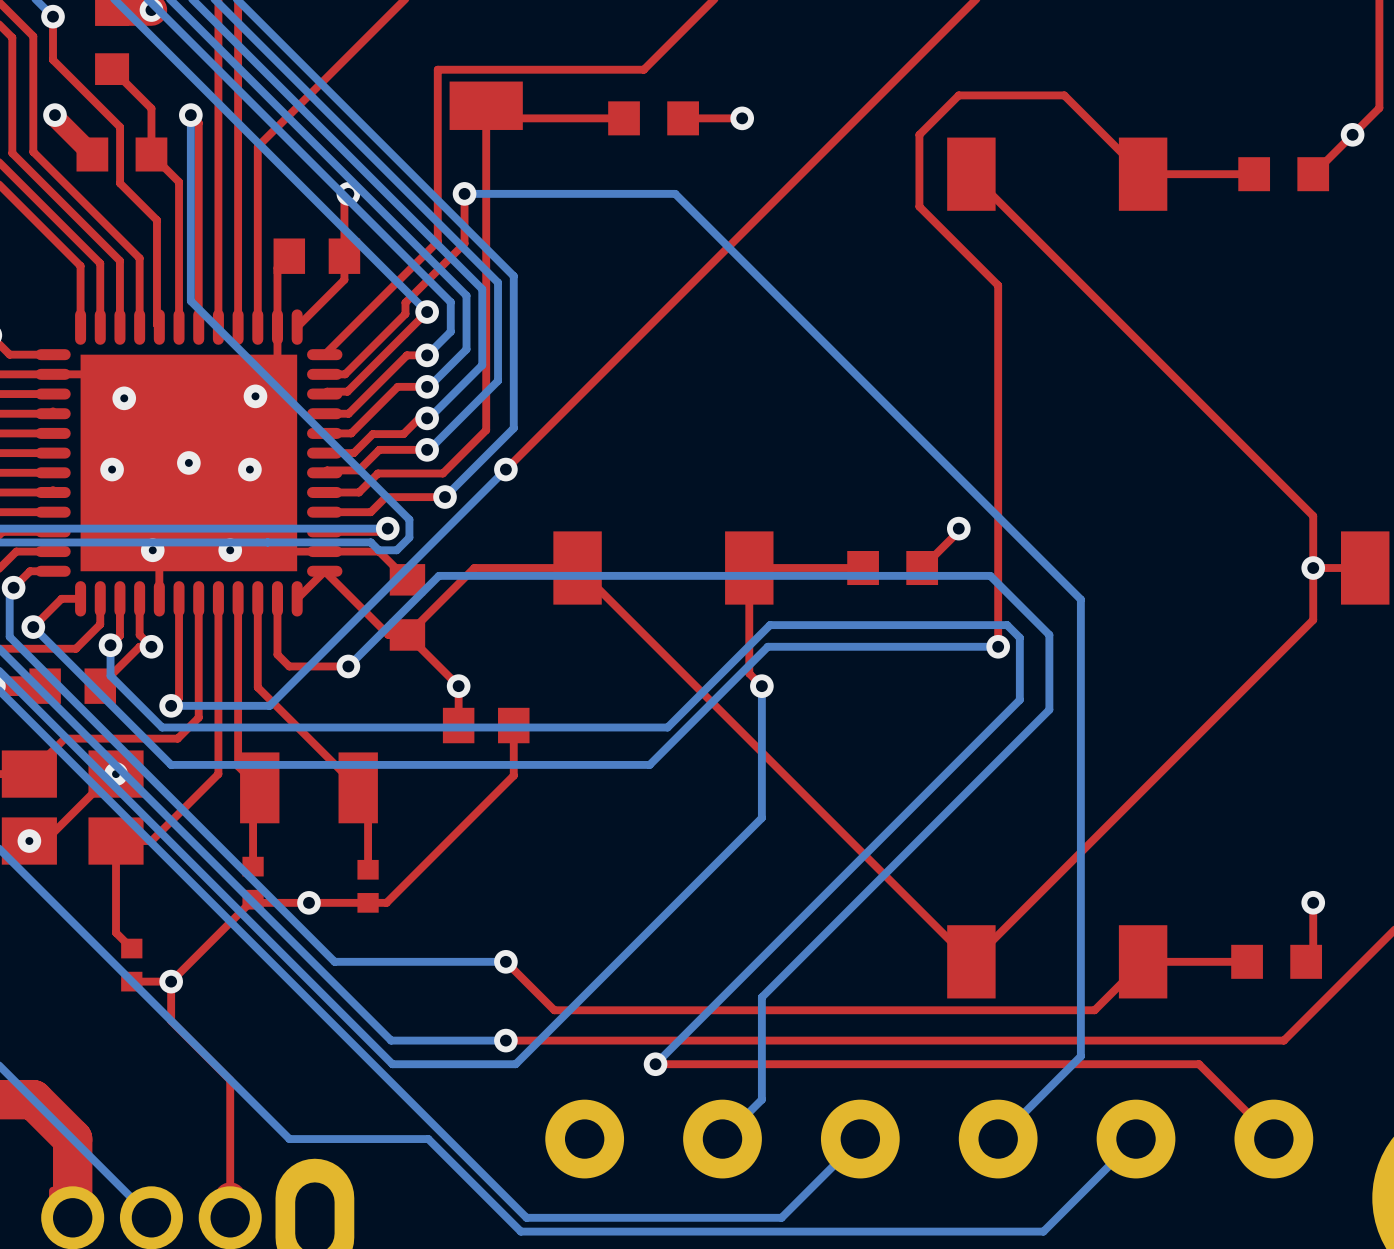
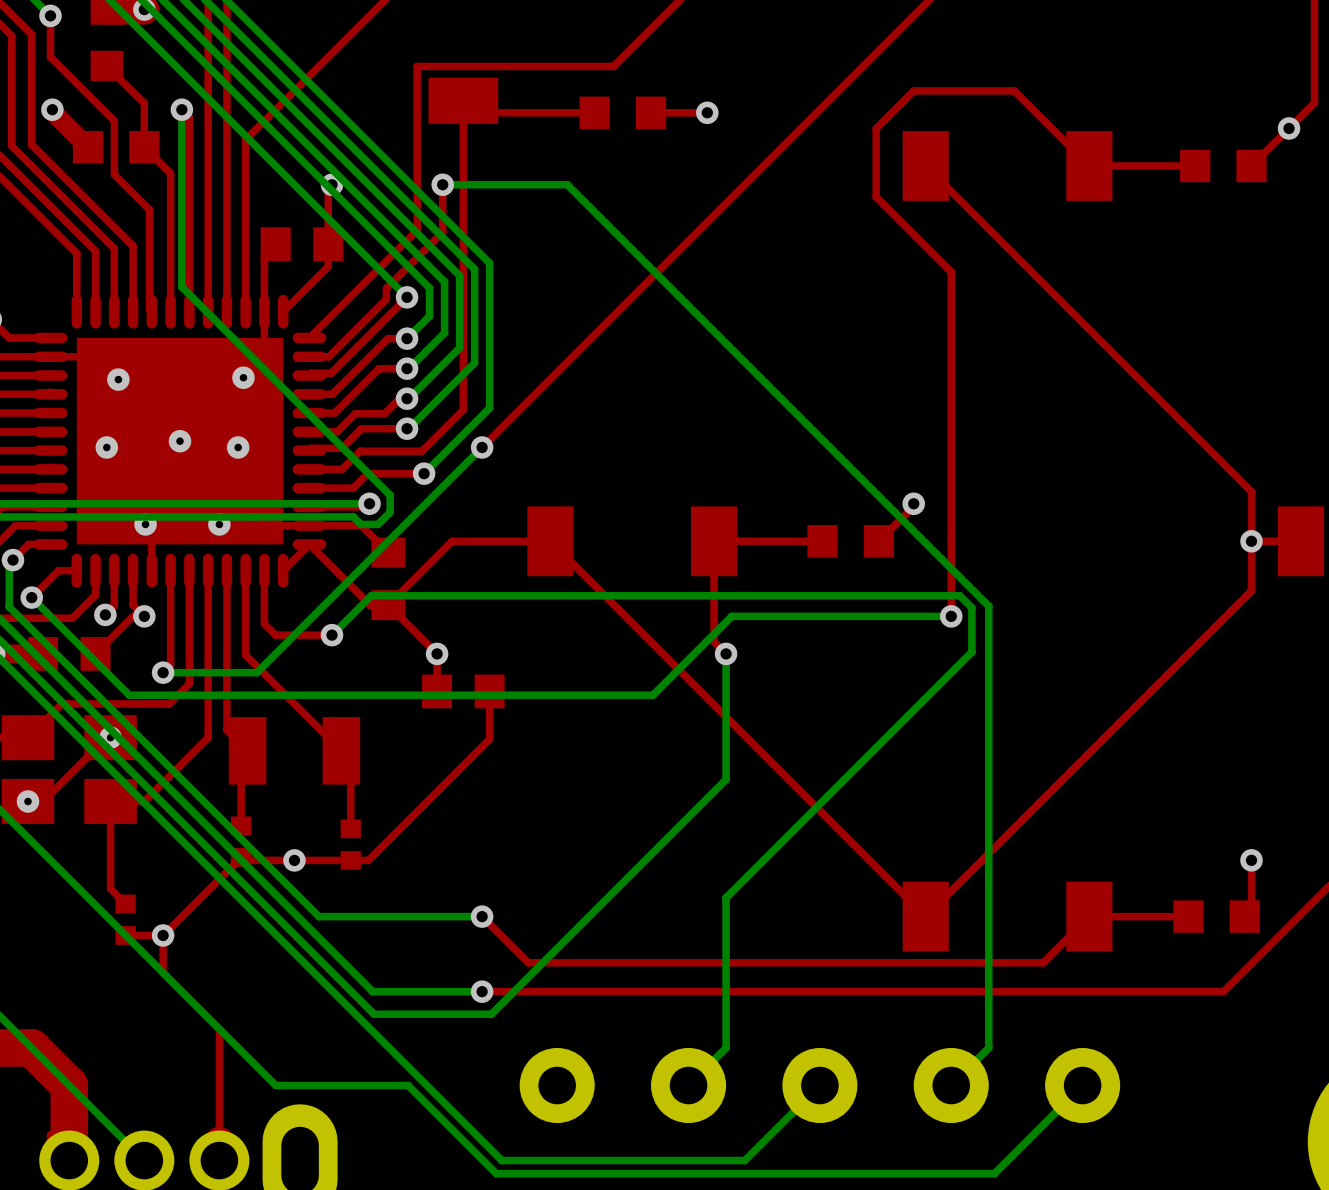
bottom track: (595, 193) (675, 193) (1080, 599) (1080, 1056) (1037, 1099) -> (567, 184) (988, 606) (988, 1047)
bottom track: (389, 625) (438, 575) (990, 575) (1049, 634) (1049, 709) (761, 997) -> none
bottom track: (770, 625) (667, 727) (162, 727) (110, 675) (110, 645) -> (733, 595) (371, 595)
bottom track: (1019, 684) (1019, 699) (655, 1064) -> (971, 652) (726, 897) (726, 950)
bottom track: (685, 729) (649, 764) (171, 764) (135, 729) -> (652, 695) (129, 695)
top track: (655, 1064) (1199, 1064) (1273, 1139) -> none
via: (655, 1064) -> none
part: (1273, 1139) -> none

